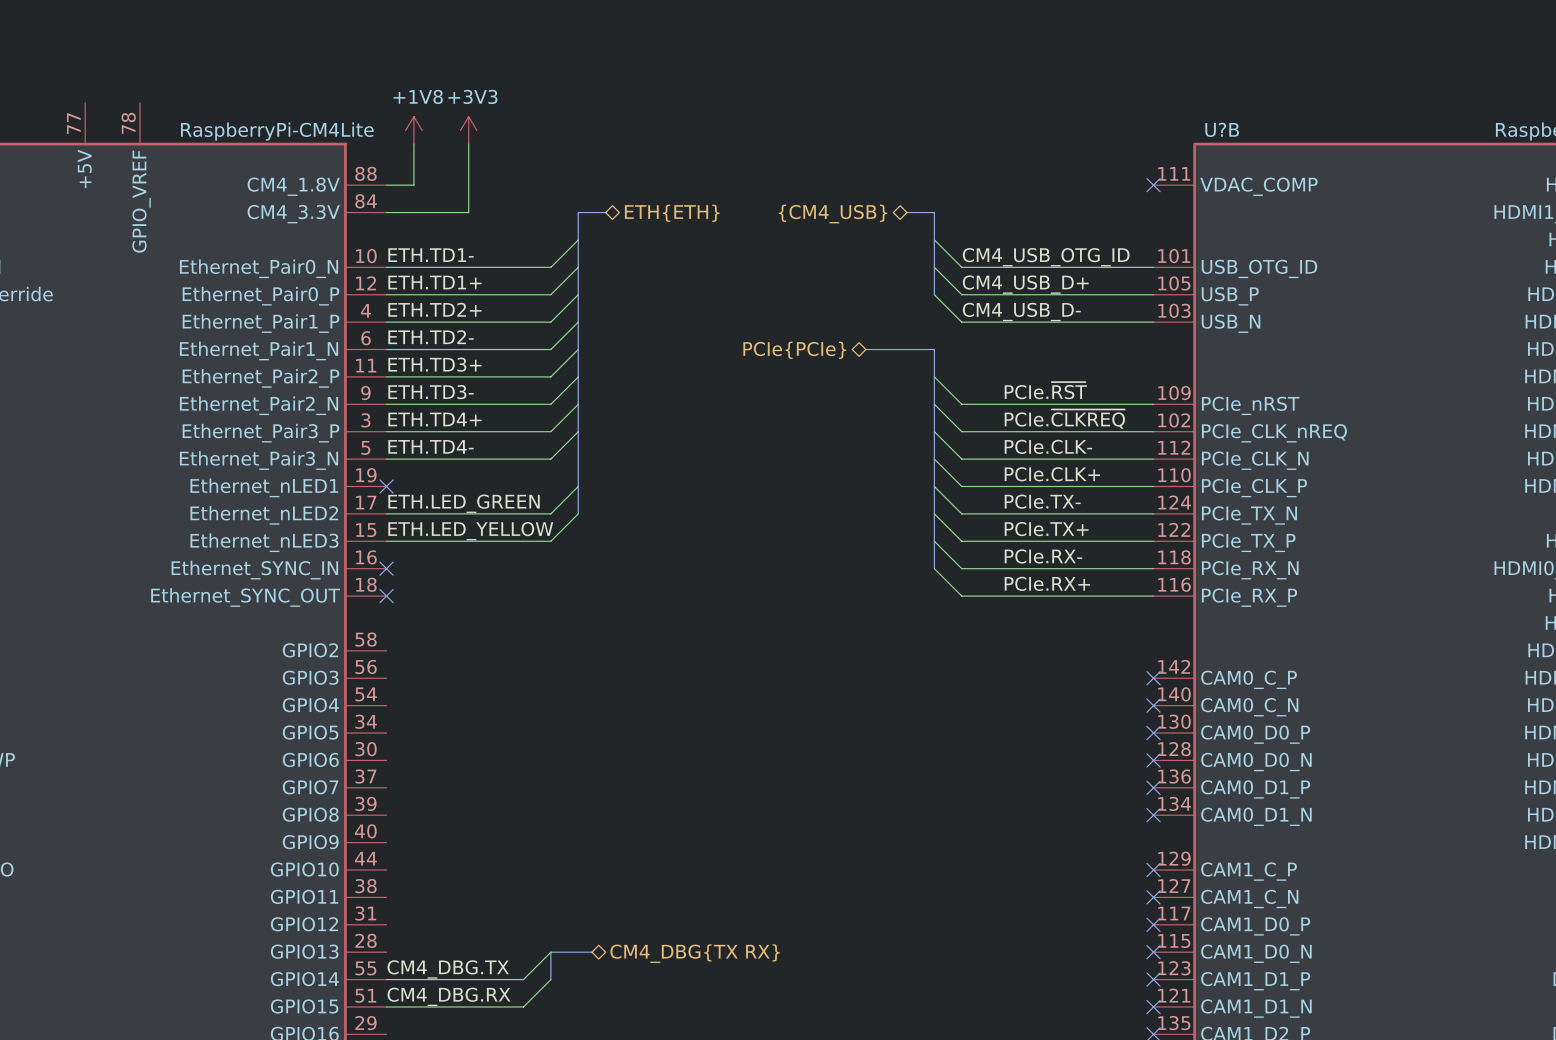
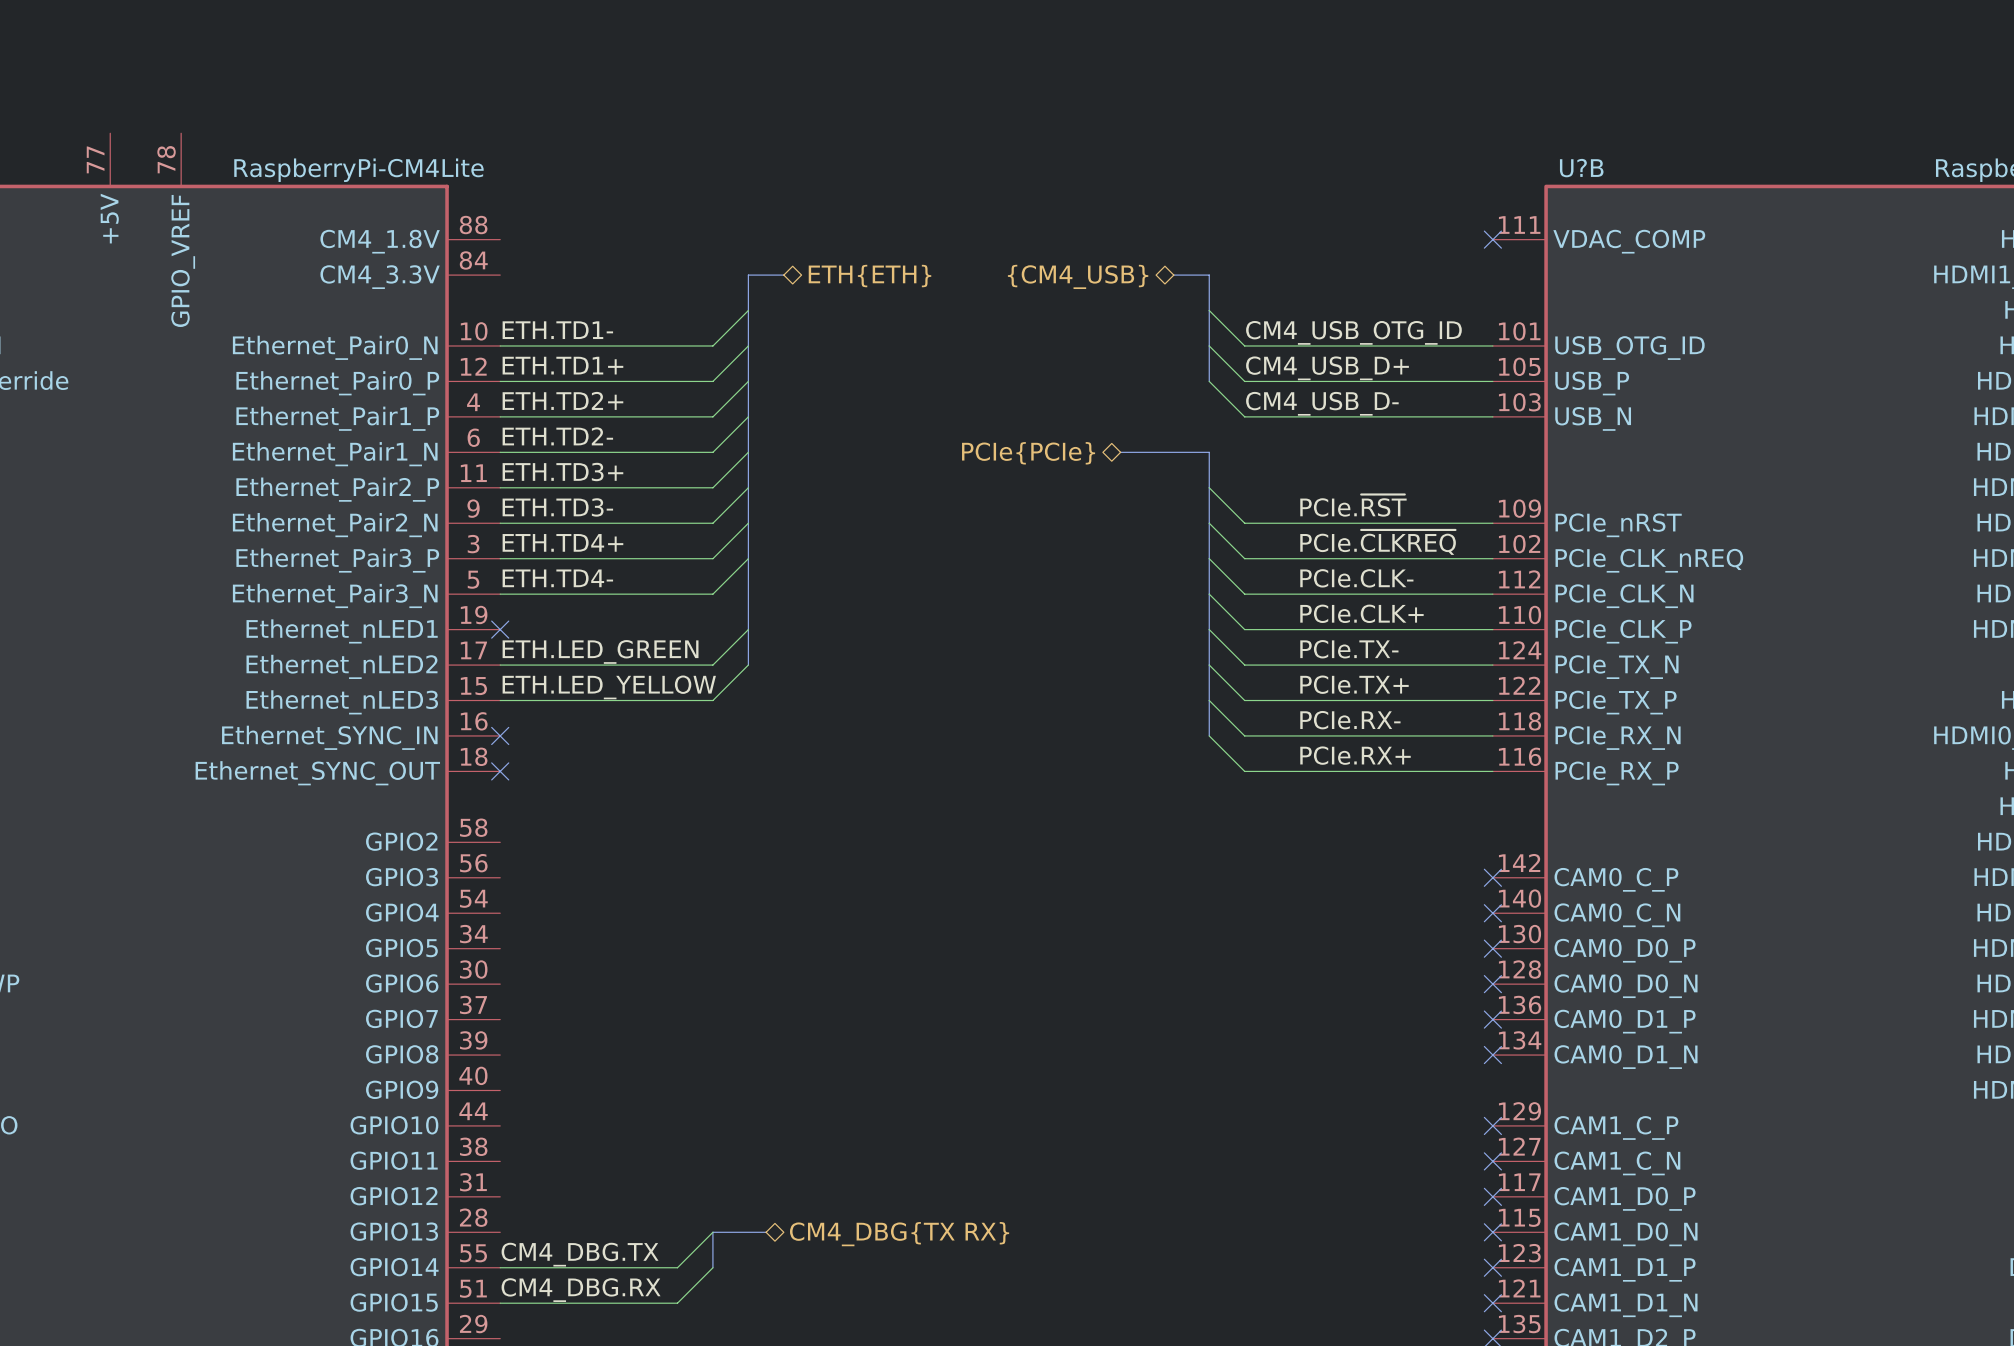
power symbol: +1V8 (413, 130) -> none
power symbol: +3V3 (468, 130) -> none
wire: (413, 144) (413, 185) (386, 185) -> none
wire: (468, 144) (468, 212) (386, 212) -> none

